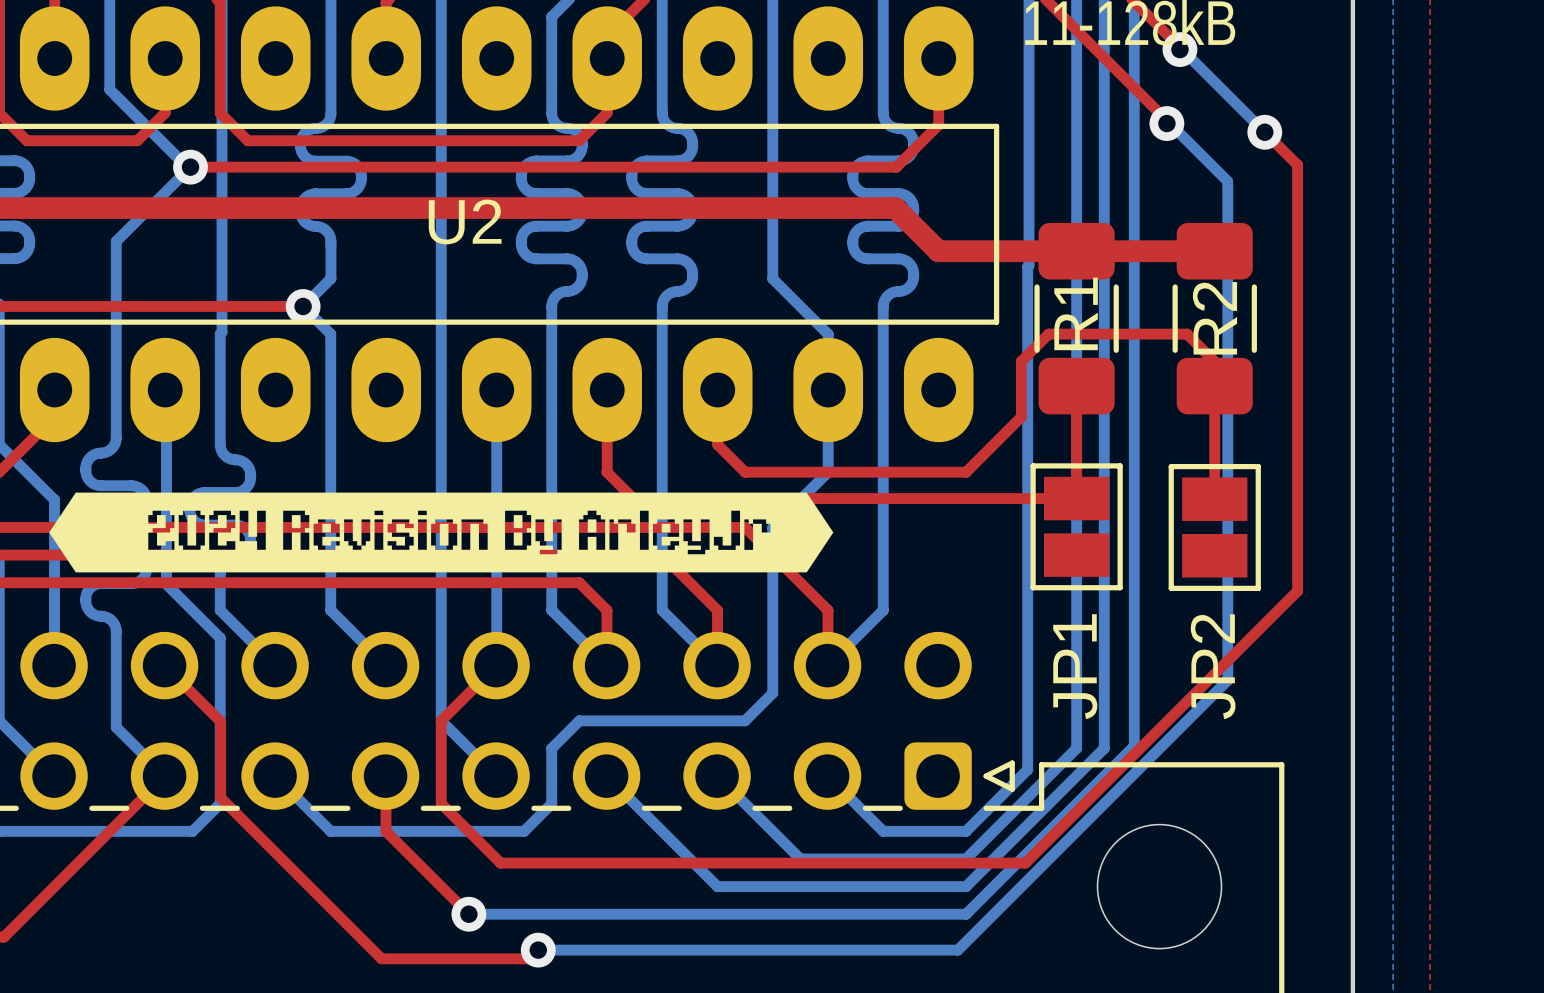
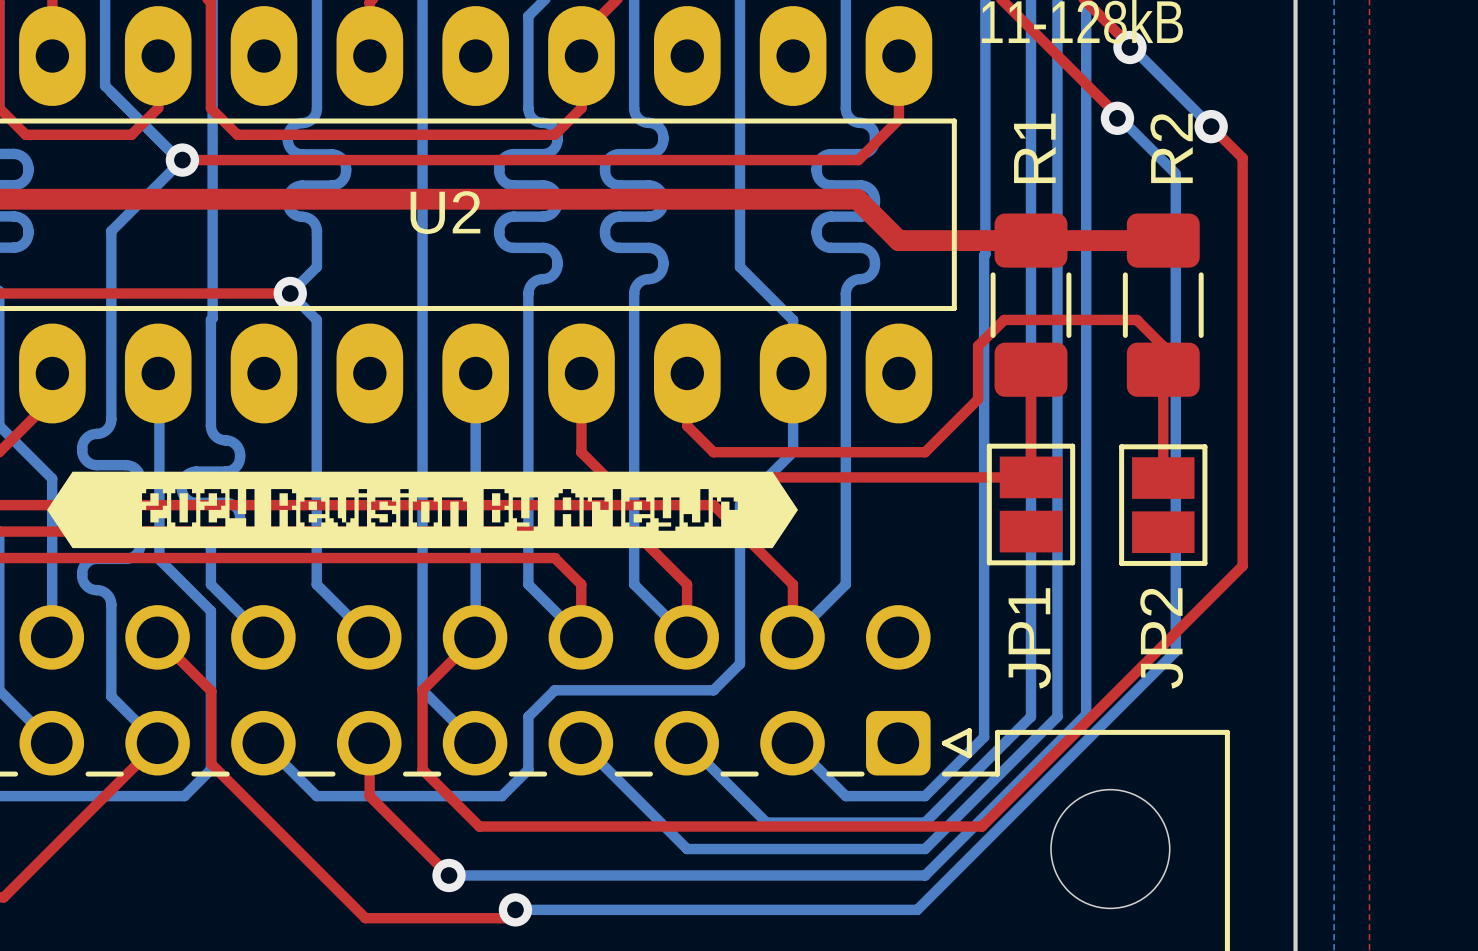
R1 name position: R1 (1076, 313) -> R1 (1034, 148)
R2 name position: R2 (1214, 318) -> R2 (1171, 148)

